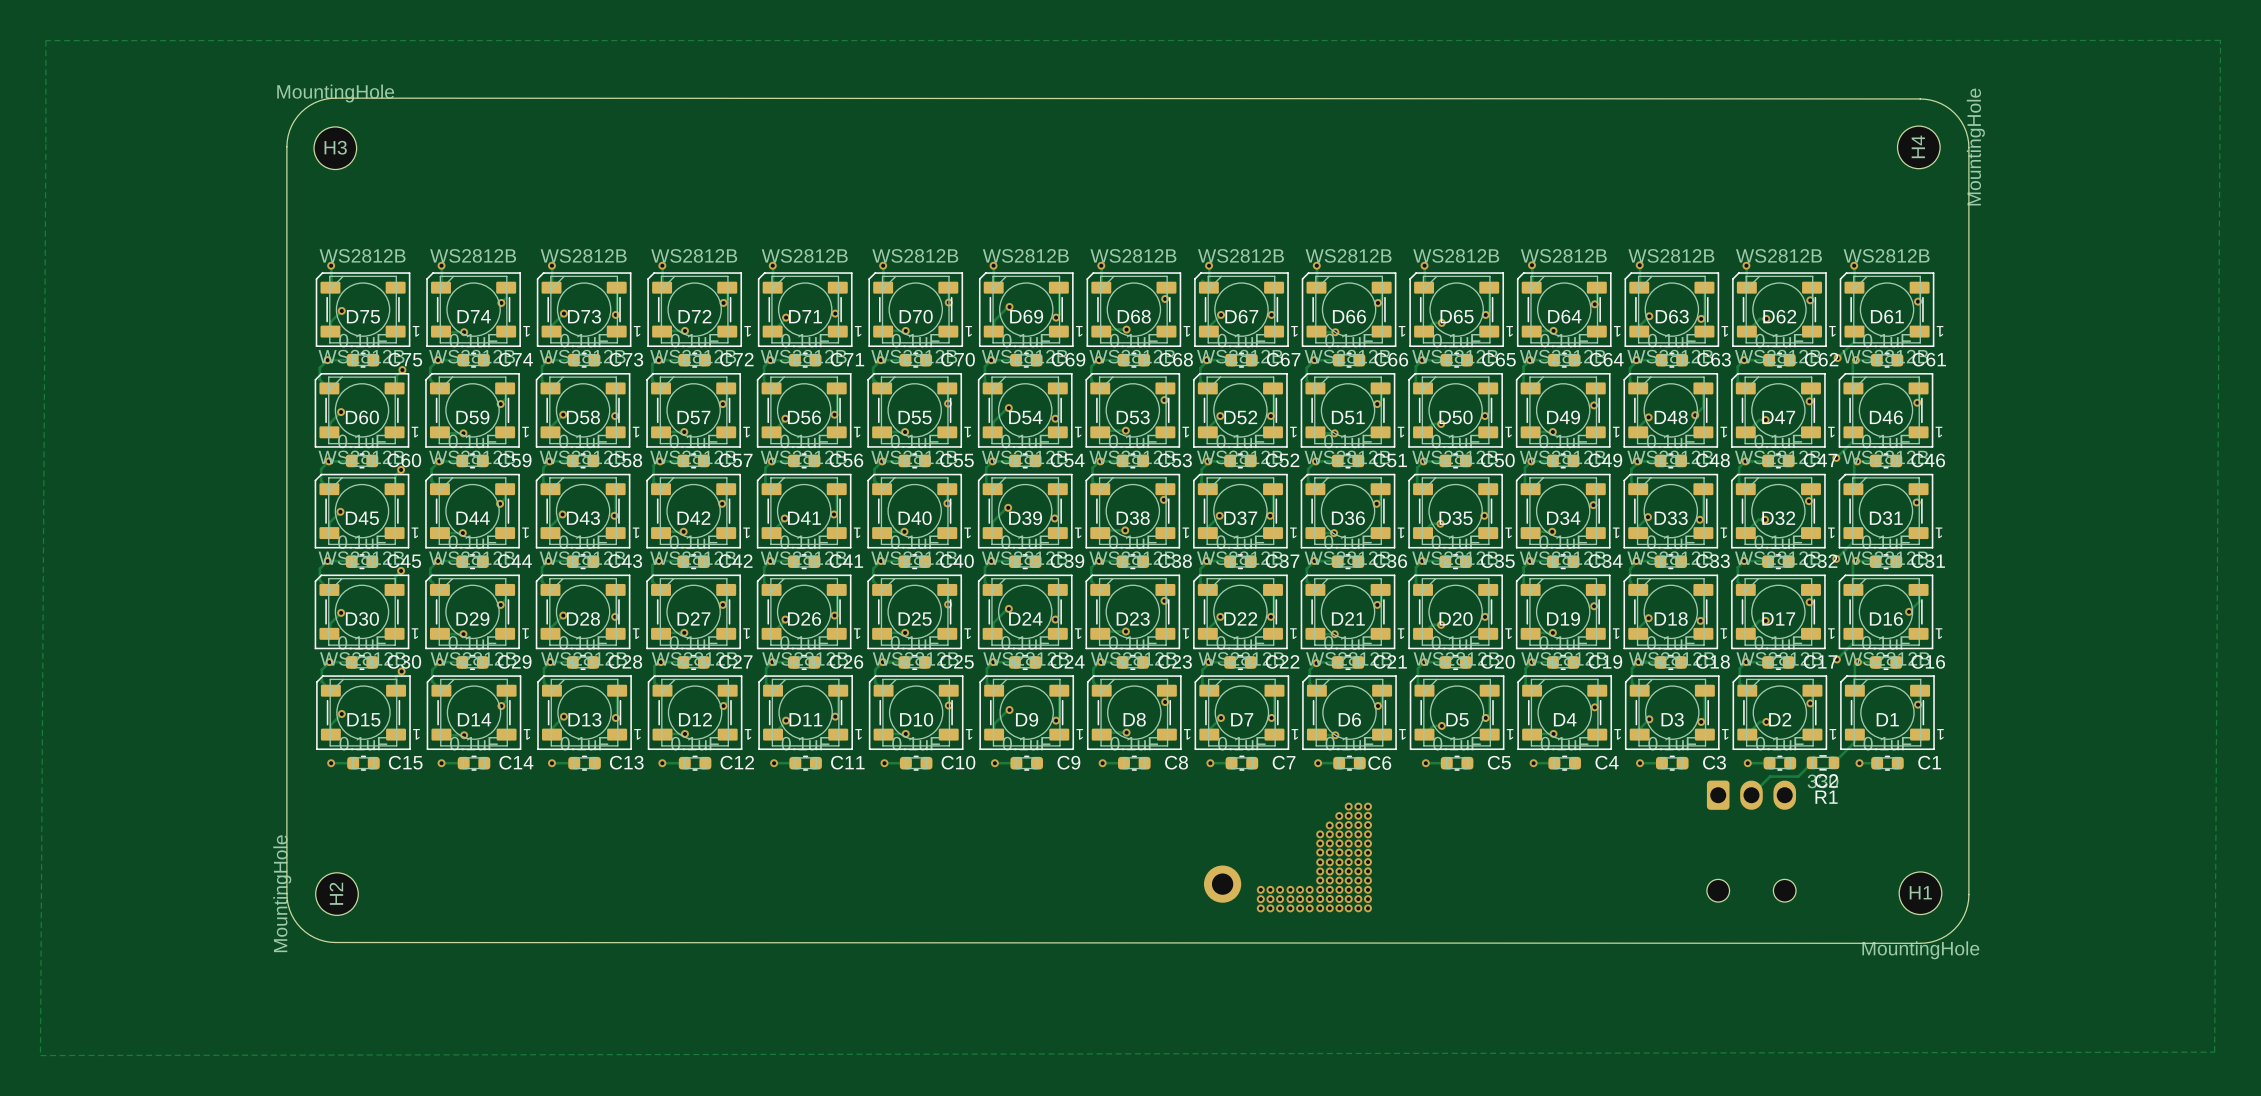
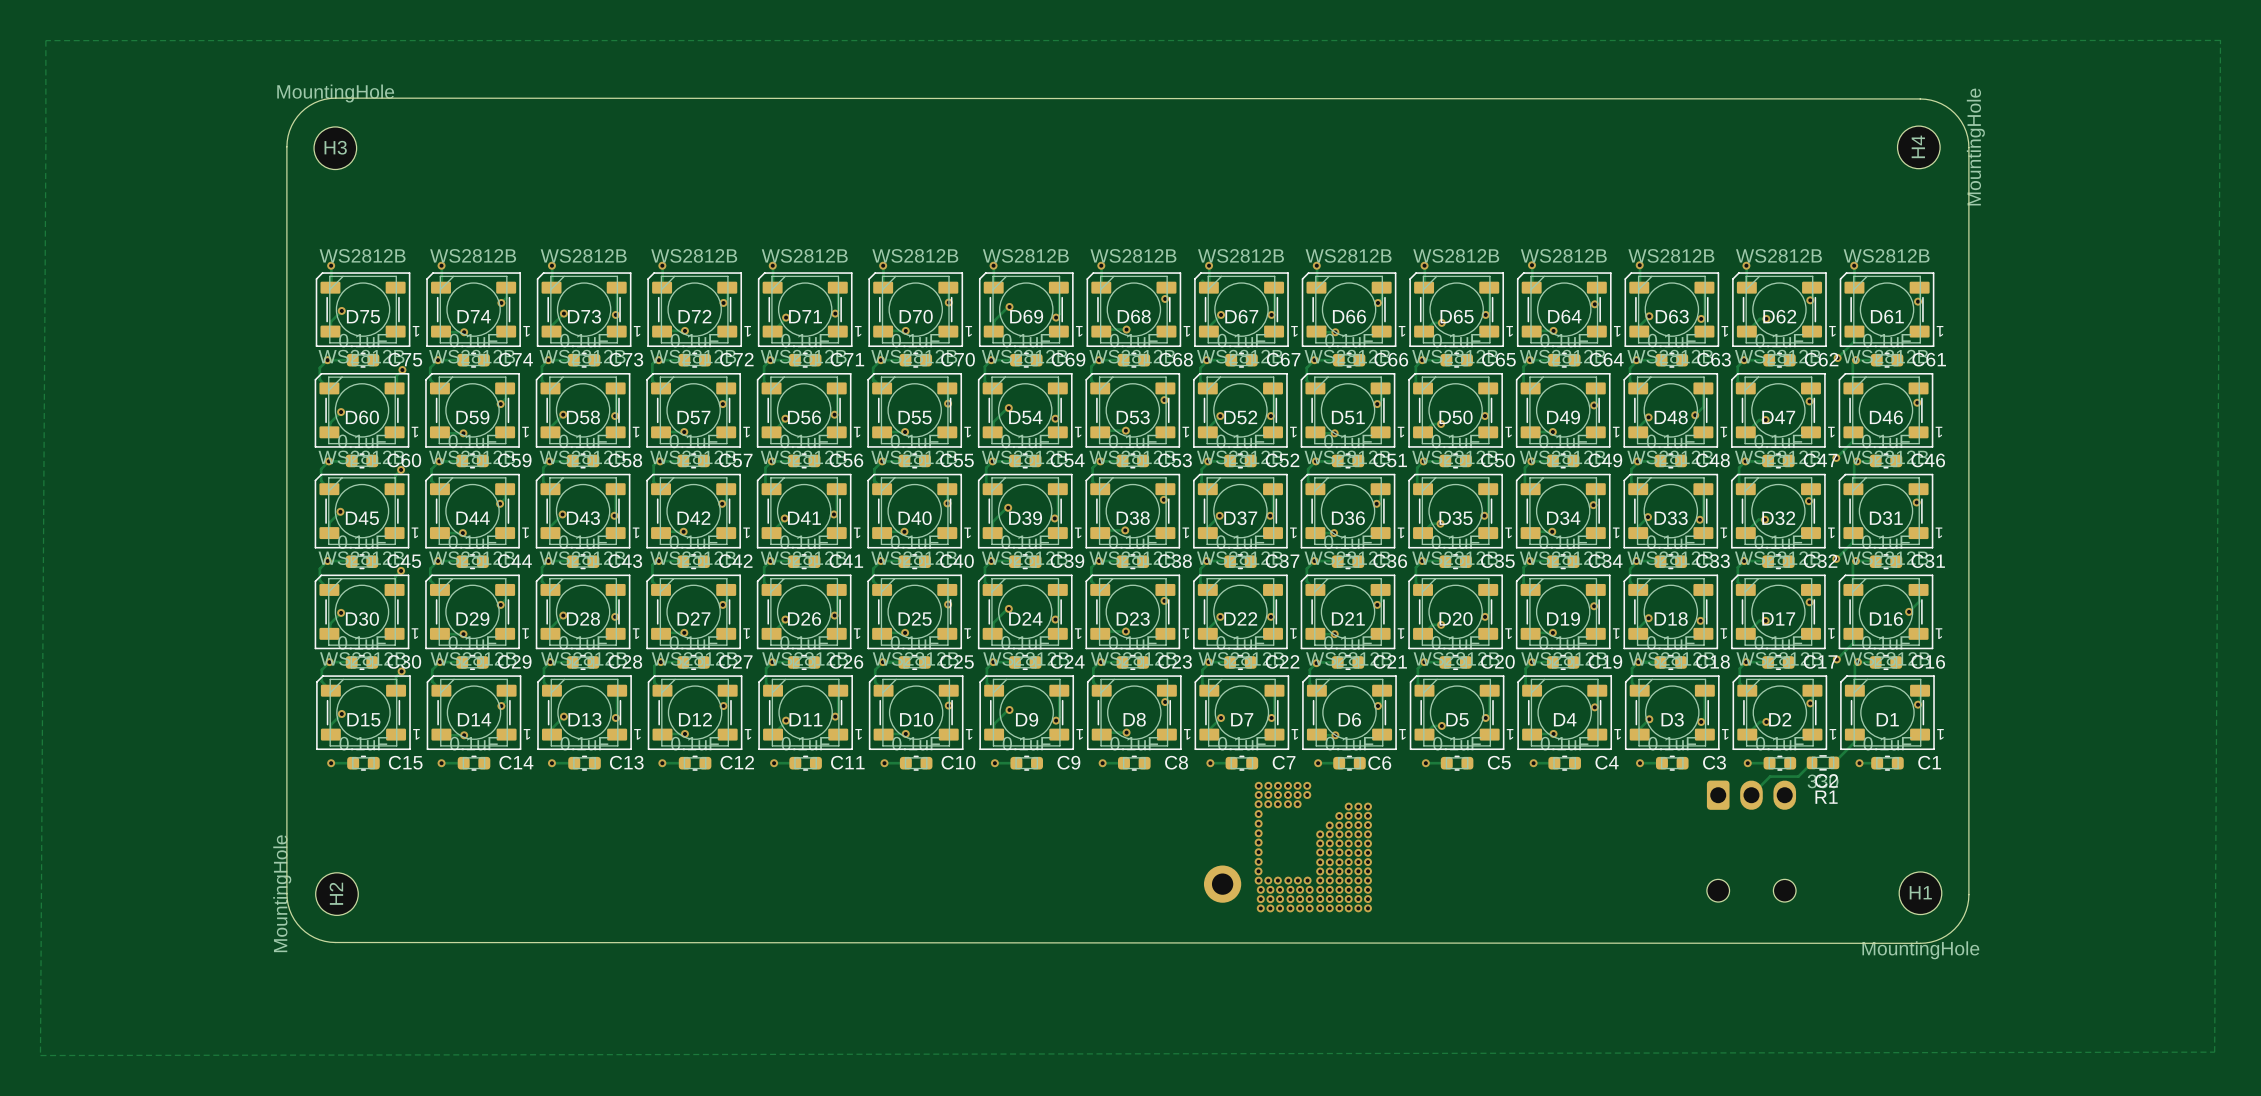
via: none -> (1258, 785)
via: none -> (1268, 785)
via: none -> (1278, 785)
via: none -> (1287, 785)
via: none -> (1297, 785)
via: none -> (1307, 785)
via: none -> (1258, 795)
via: none -> (1268, 795)
via: none -> (1278, 795)
via: none -> (1287, 795)
via: none -> (1297, 795)
via: none -> (1307, 795)
via: none -> (1258, 804)
via: none -> (1268, 804)
via: none -> (1277, 804)
via: none -> (1287, 804)
via: none -> (1297, 804)
via: none -> (1258, 814)
via: none -> (1258, 823)
via: none -> (1258, 833)
via: none -> (1258, 842)
via: none -> (1258, 852)
via: none -> (1258, 861)
via: none -> (1258, 871)
via: none -> (1258, 880)
via: none -> (1268, 880)
via: none -> (1277, 880)
via: none -> (1288, 880)
via: none -> (1297, 880)
via: none -> (1307, 880)

